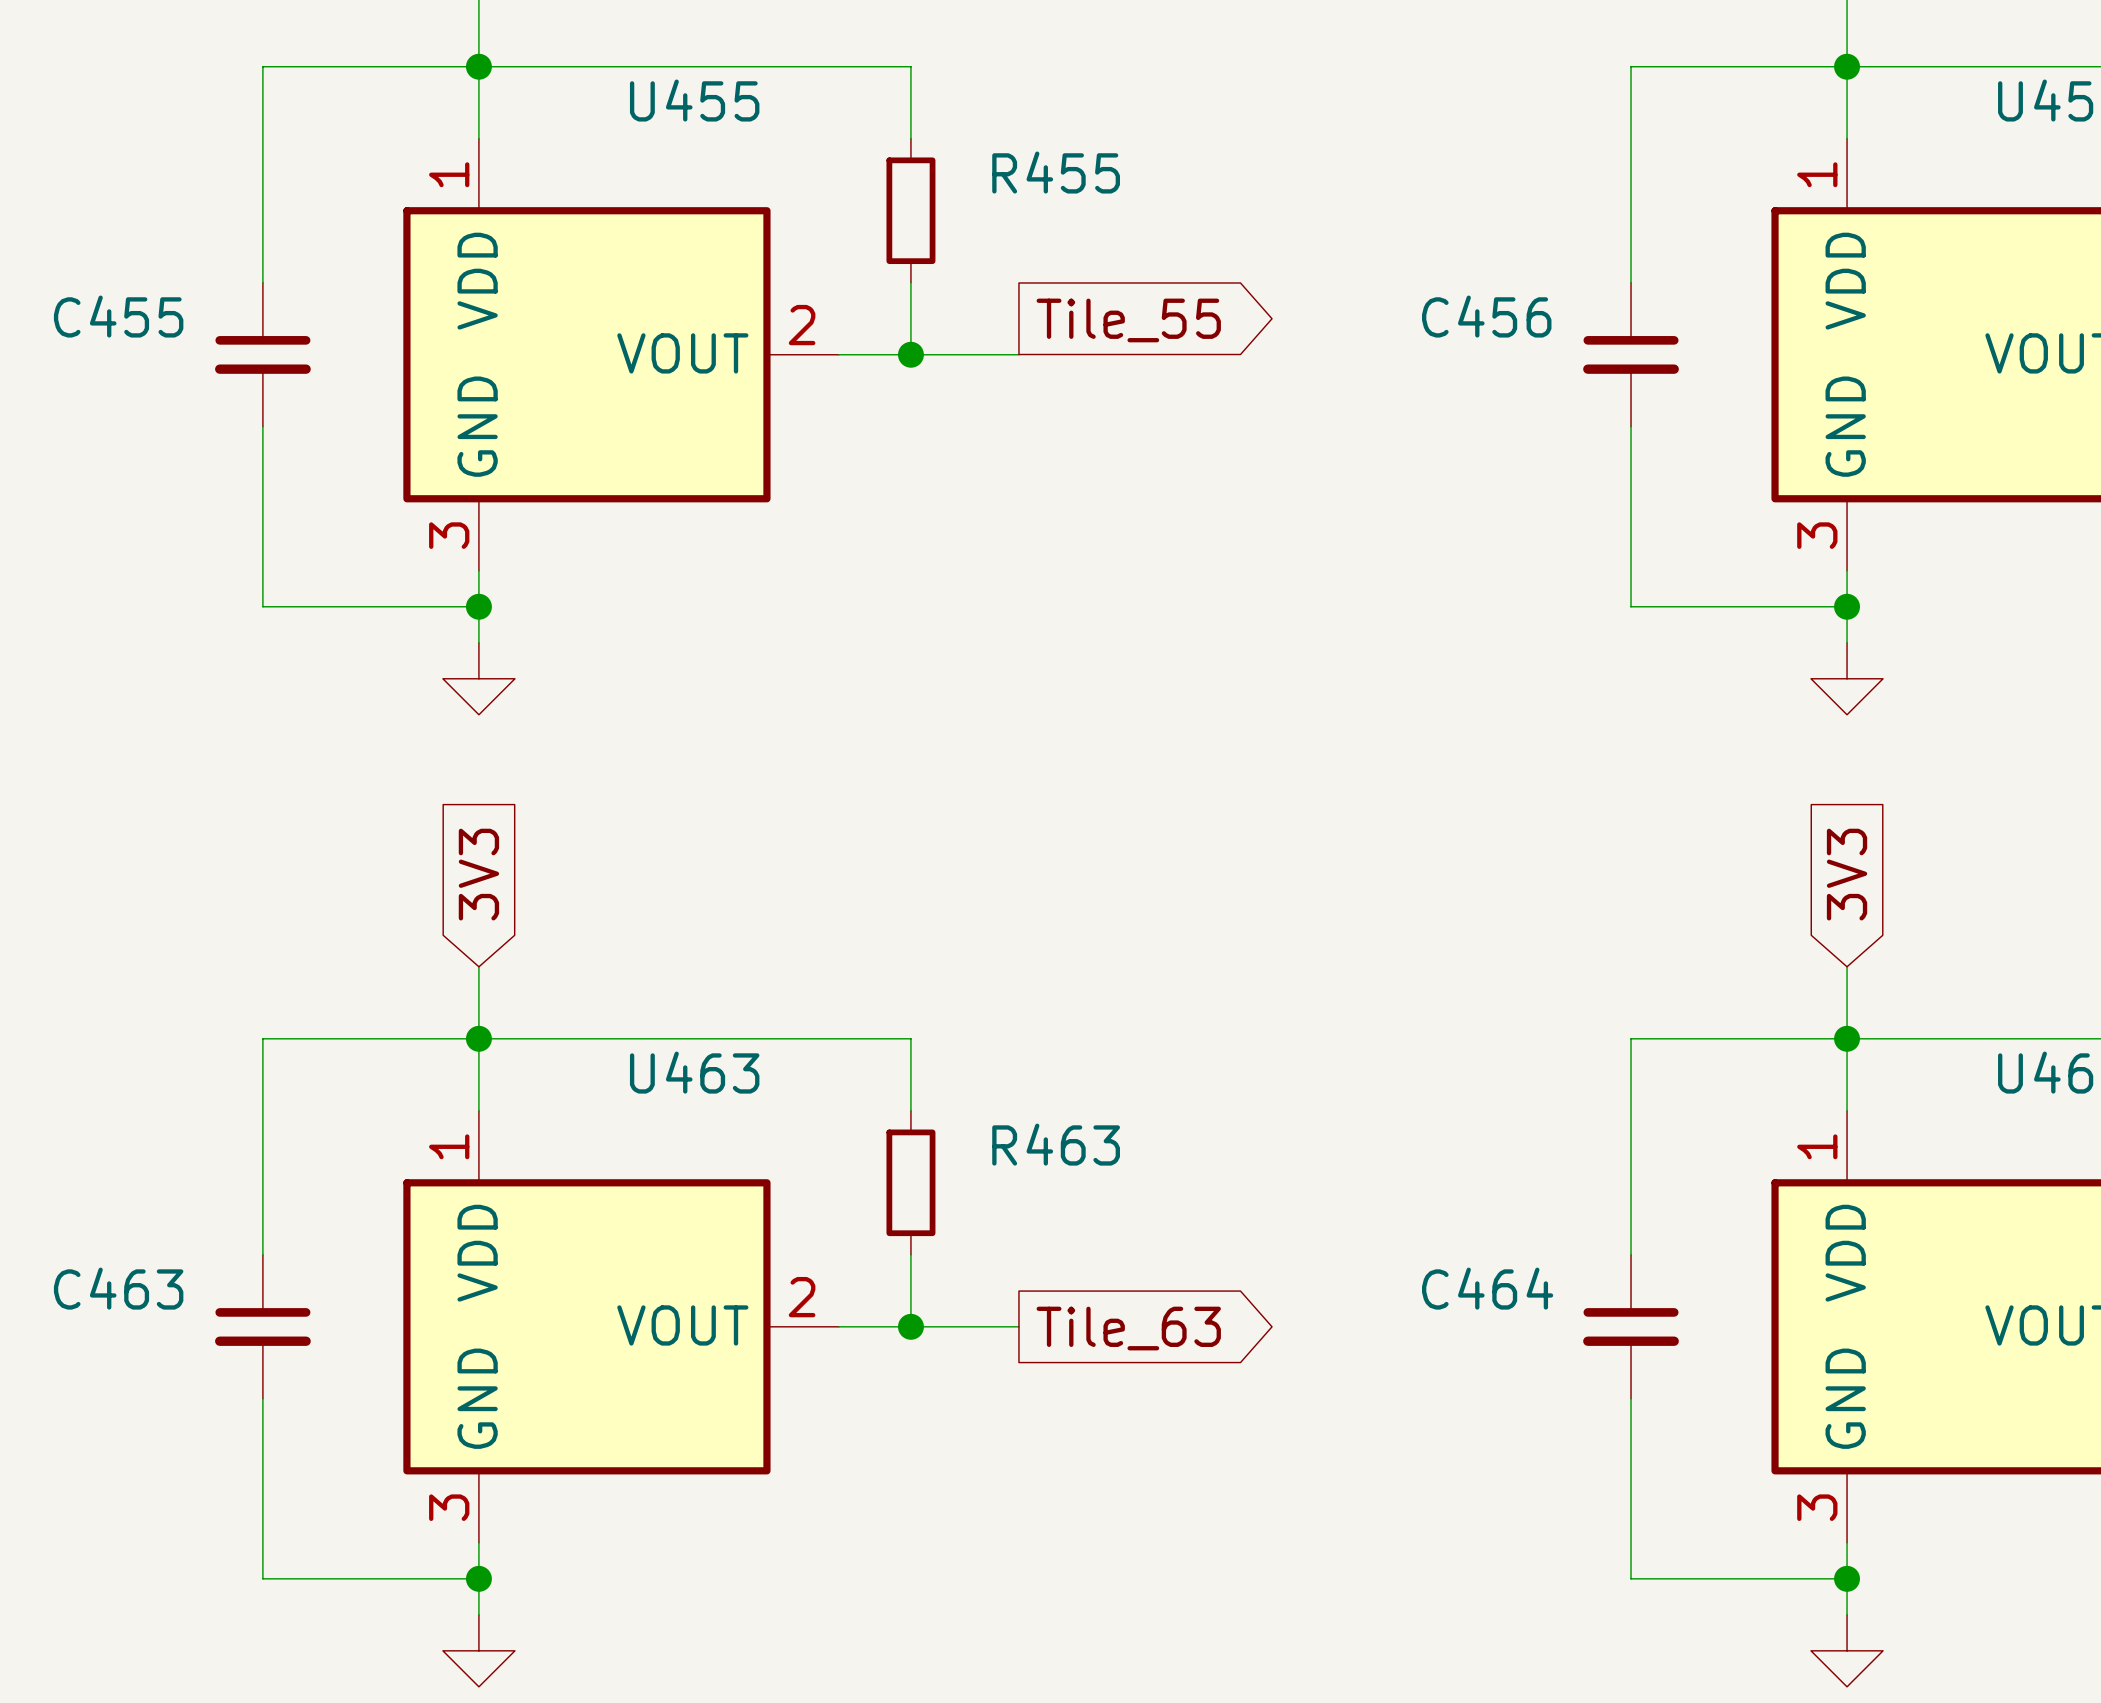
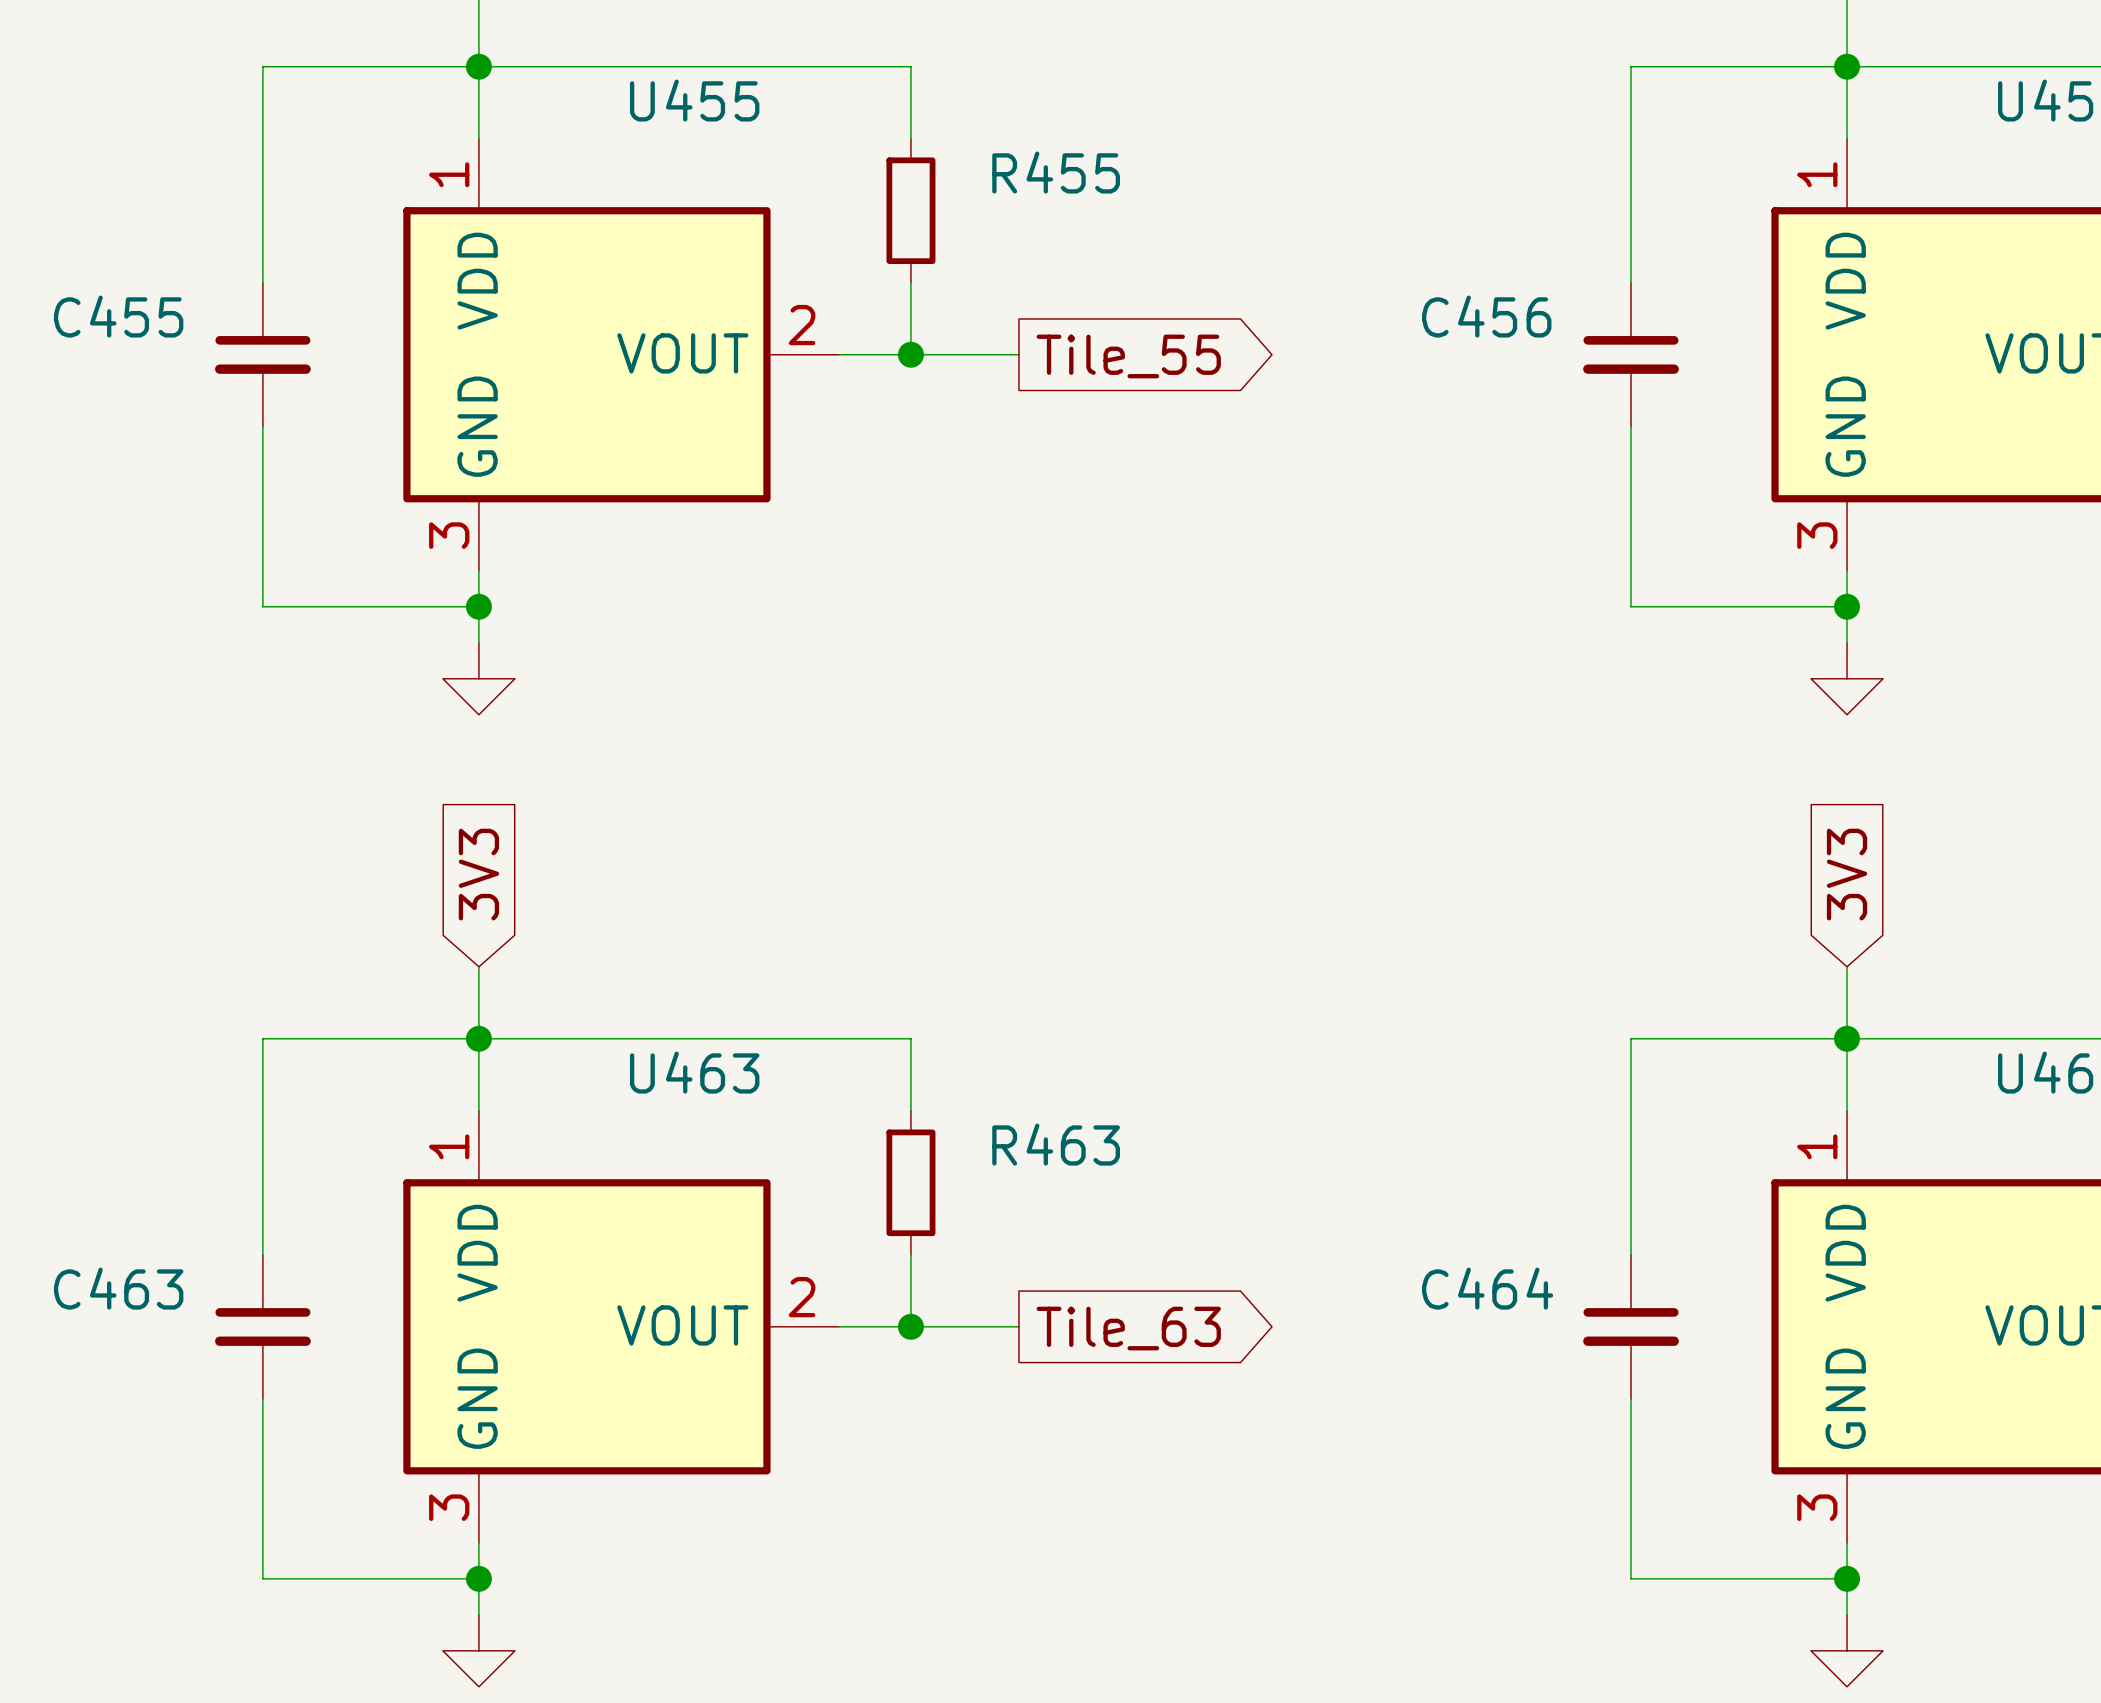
global label position: Tile_55 (1128, 320) -> Tile_55 (1128, 356)

